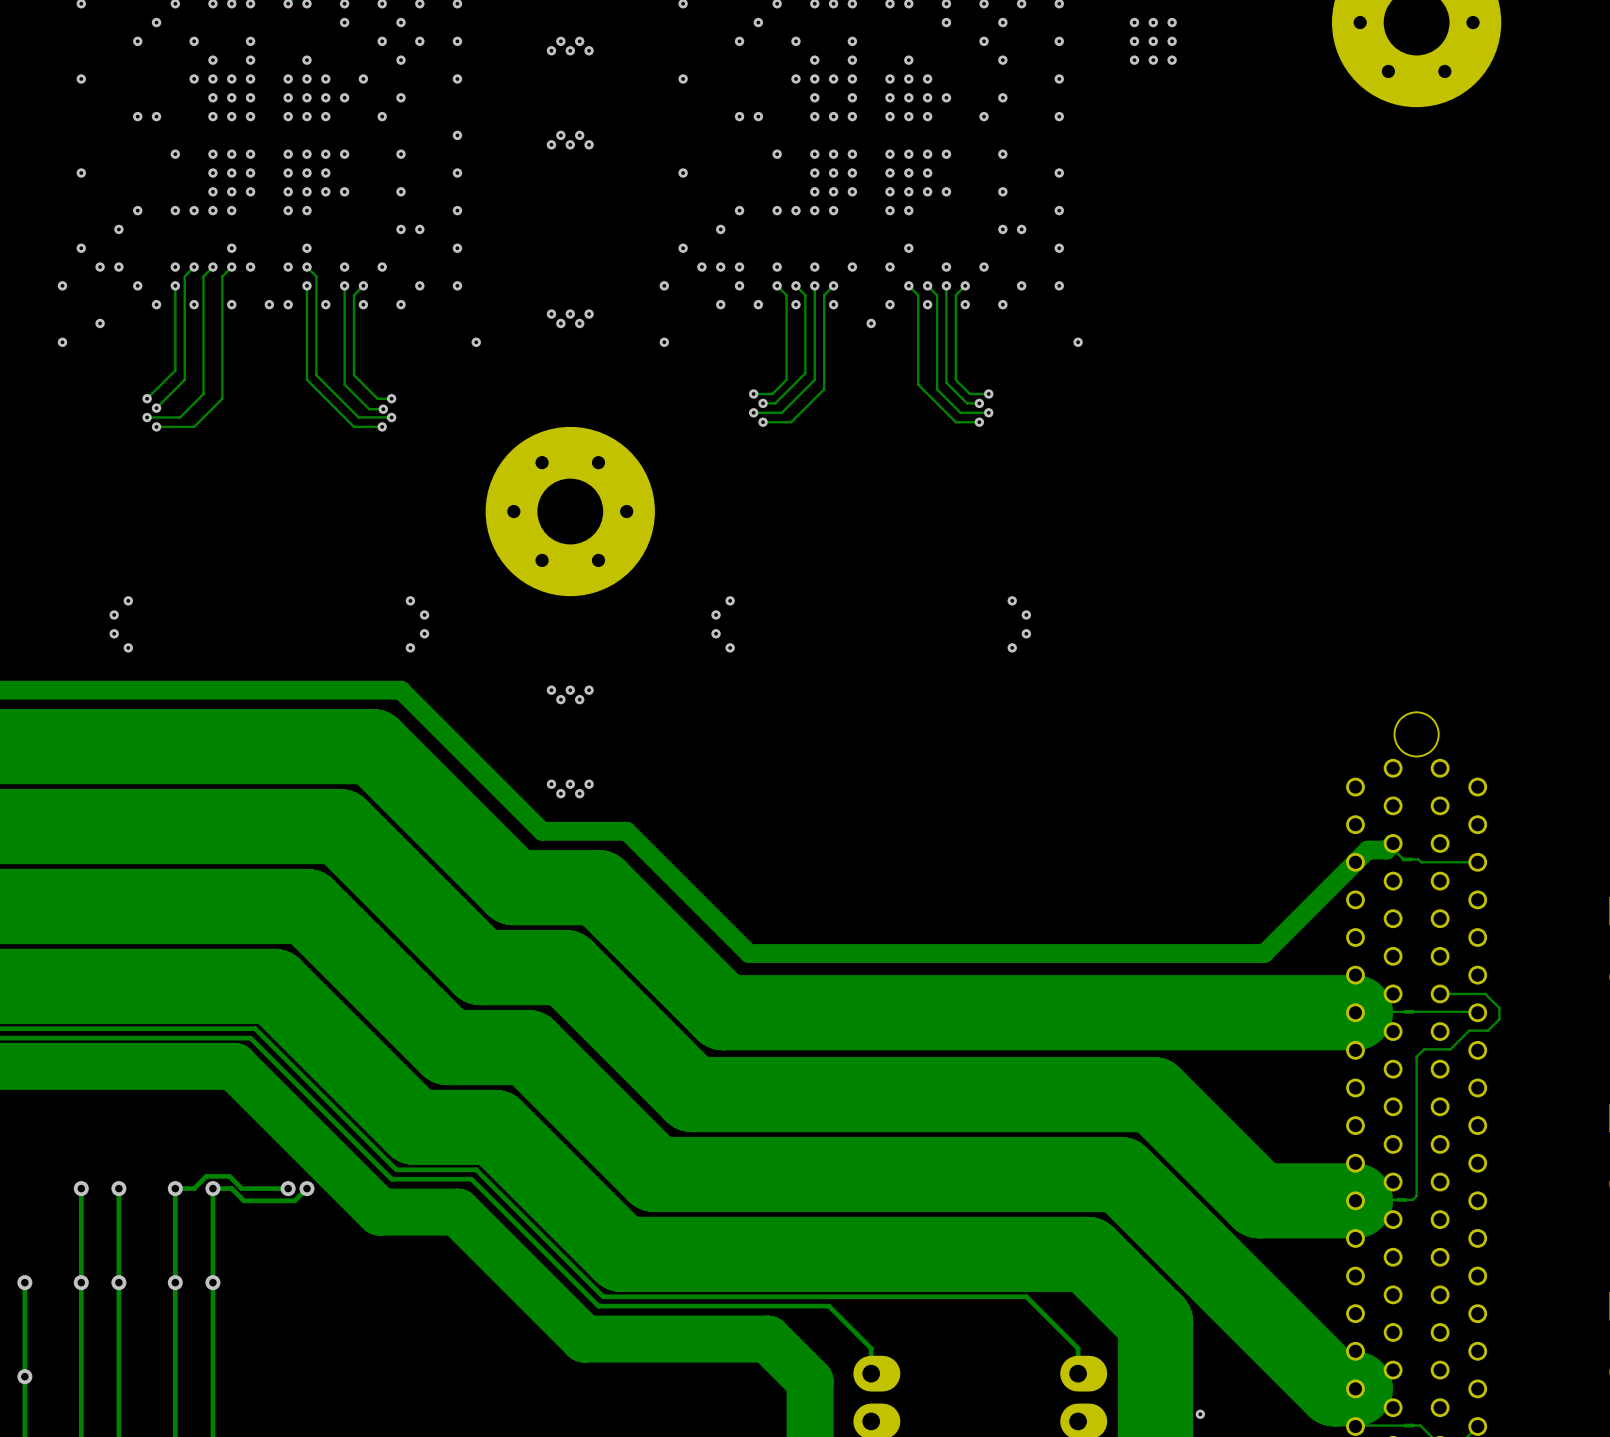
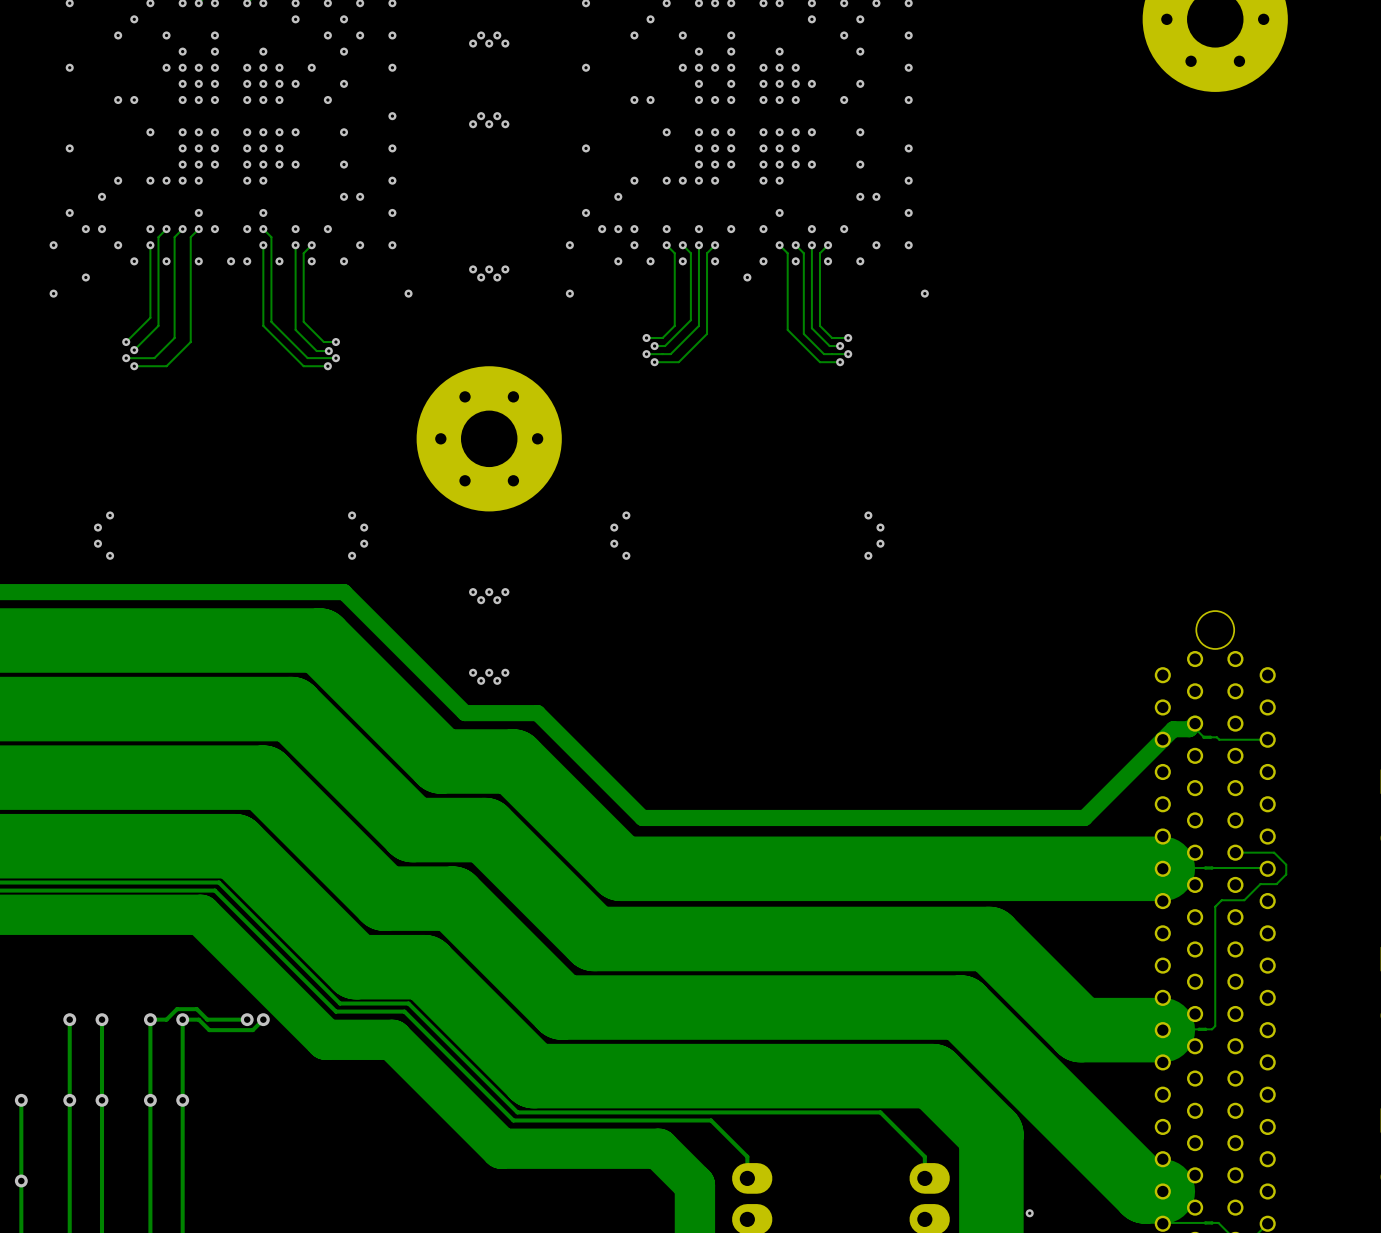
via: (1134, 22) -> none
via: (1153, 22) -> none
via: (1172, 22) -> none
via: (1134, 41) -> none
via: (1153, 41) -> none
via: (1172, 41) -> none
via: (1134, 60) -> none
via: (1153, 60) -> none
via: (1172, 60) -> none

